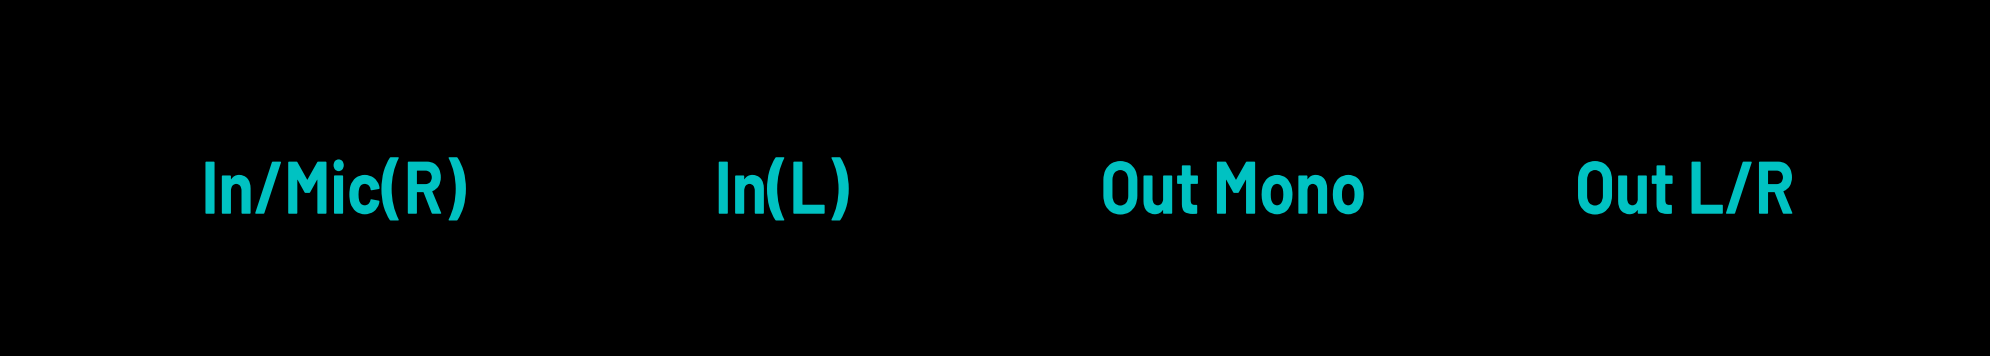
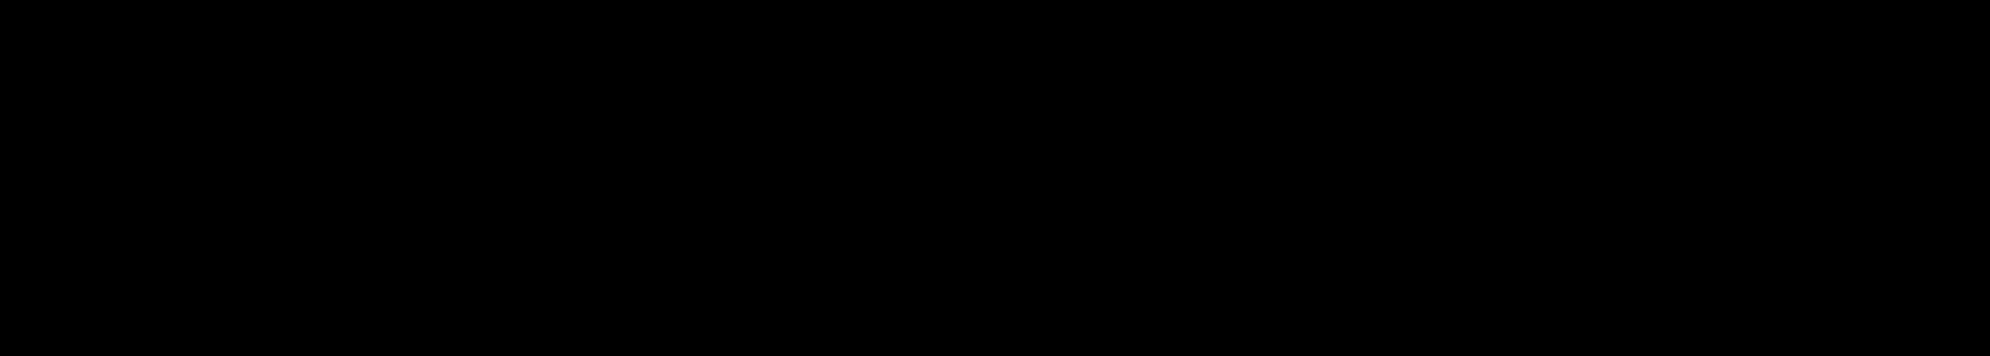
text: Out Mono (1233, 187) -> none
text: Out L/R (1685, 187) -> none
text: In/Mic(R) (335, 188) -> none
text: In(L) (783, 188) -> none

